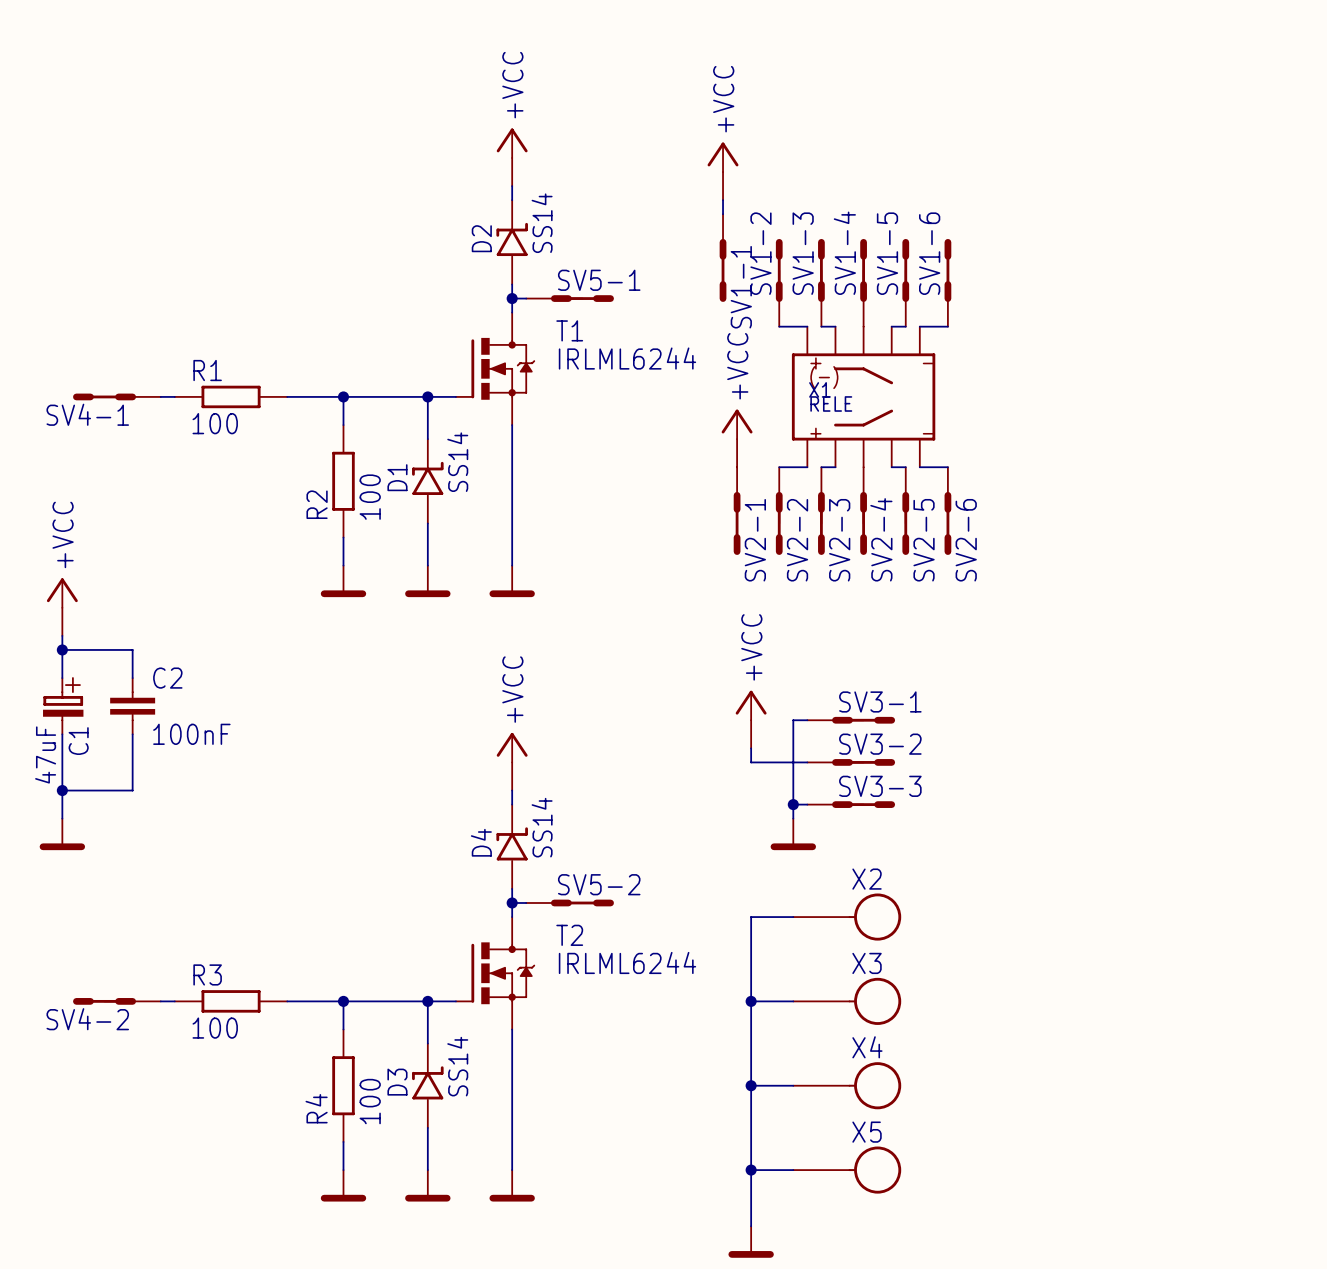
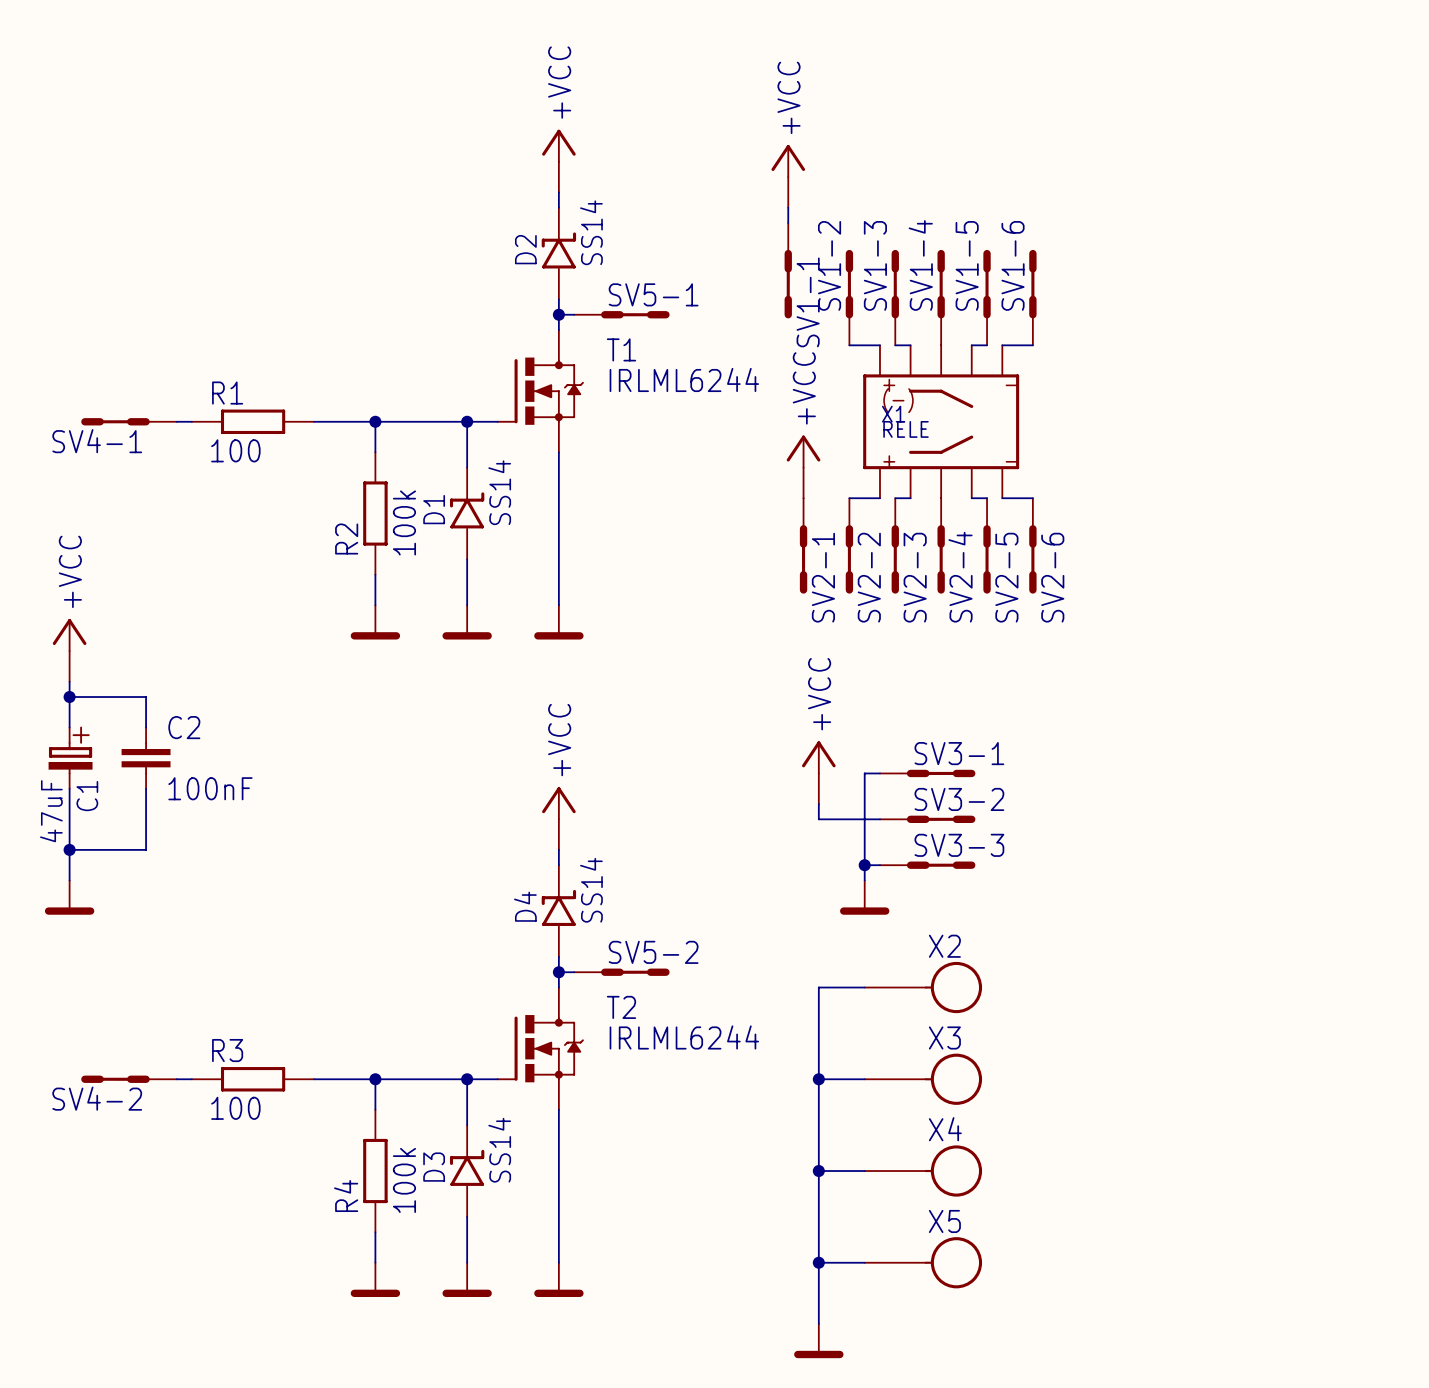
R2 value: 100 (370, 497) -> 100k (404, 522)
R4 value: 100 (370, 1101) -> 100k (404, 1180)

